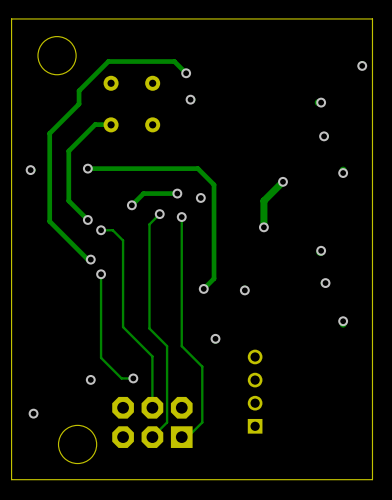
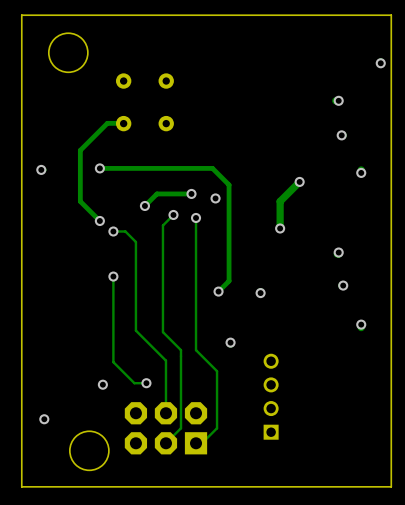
track: (186, 73) (174, 61) (108, 61) (79, 90) (79, 104) (49, 133) (49, 221) (87, 259) (90, 259) -> none
via: (186, 73) -> none
via: (190, 99) -> none
via: (90, 259) -> none

